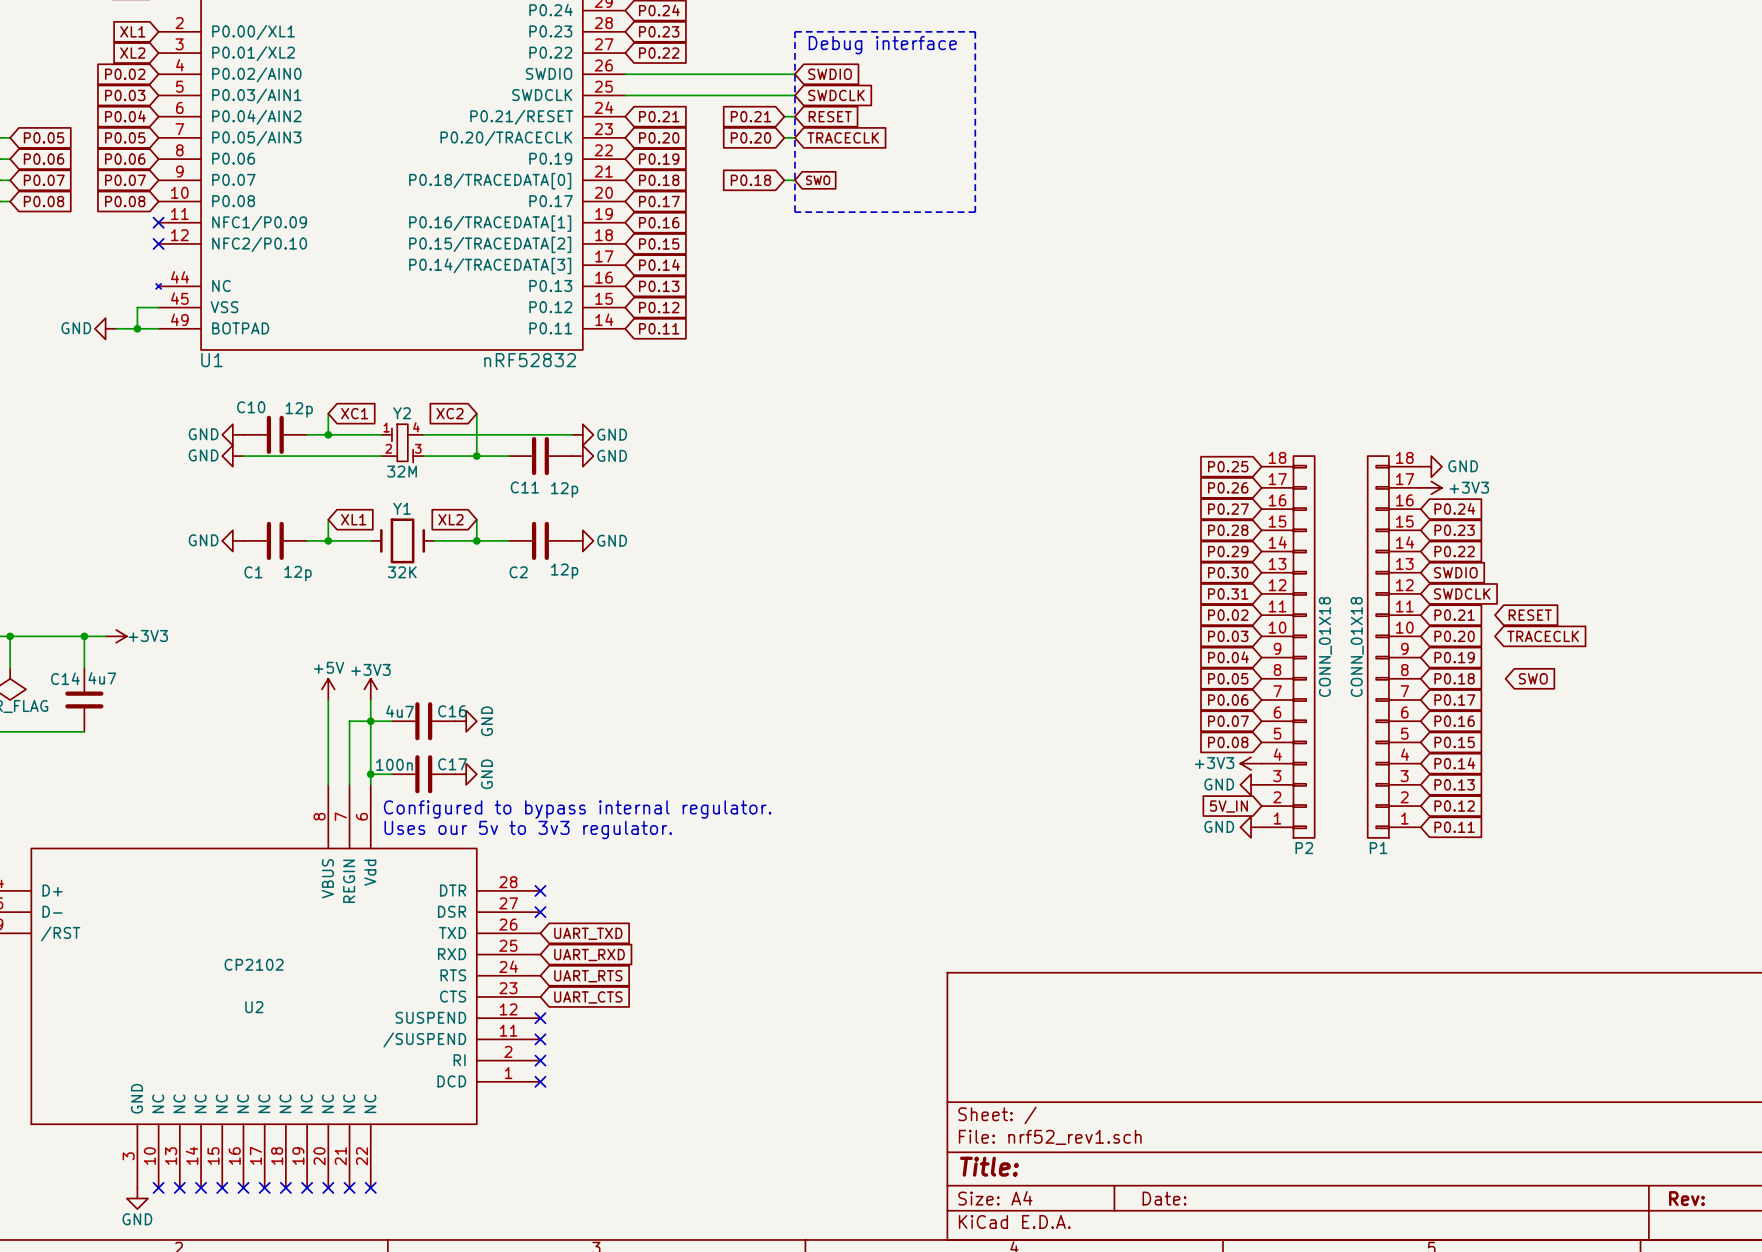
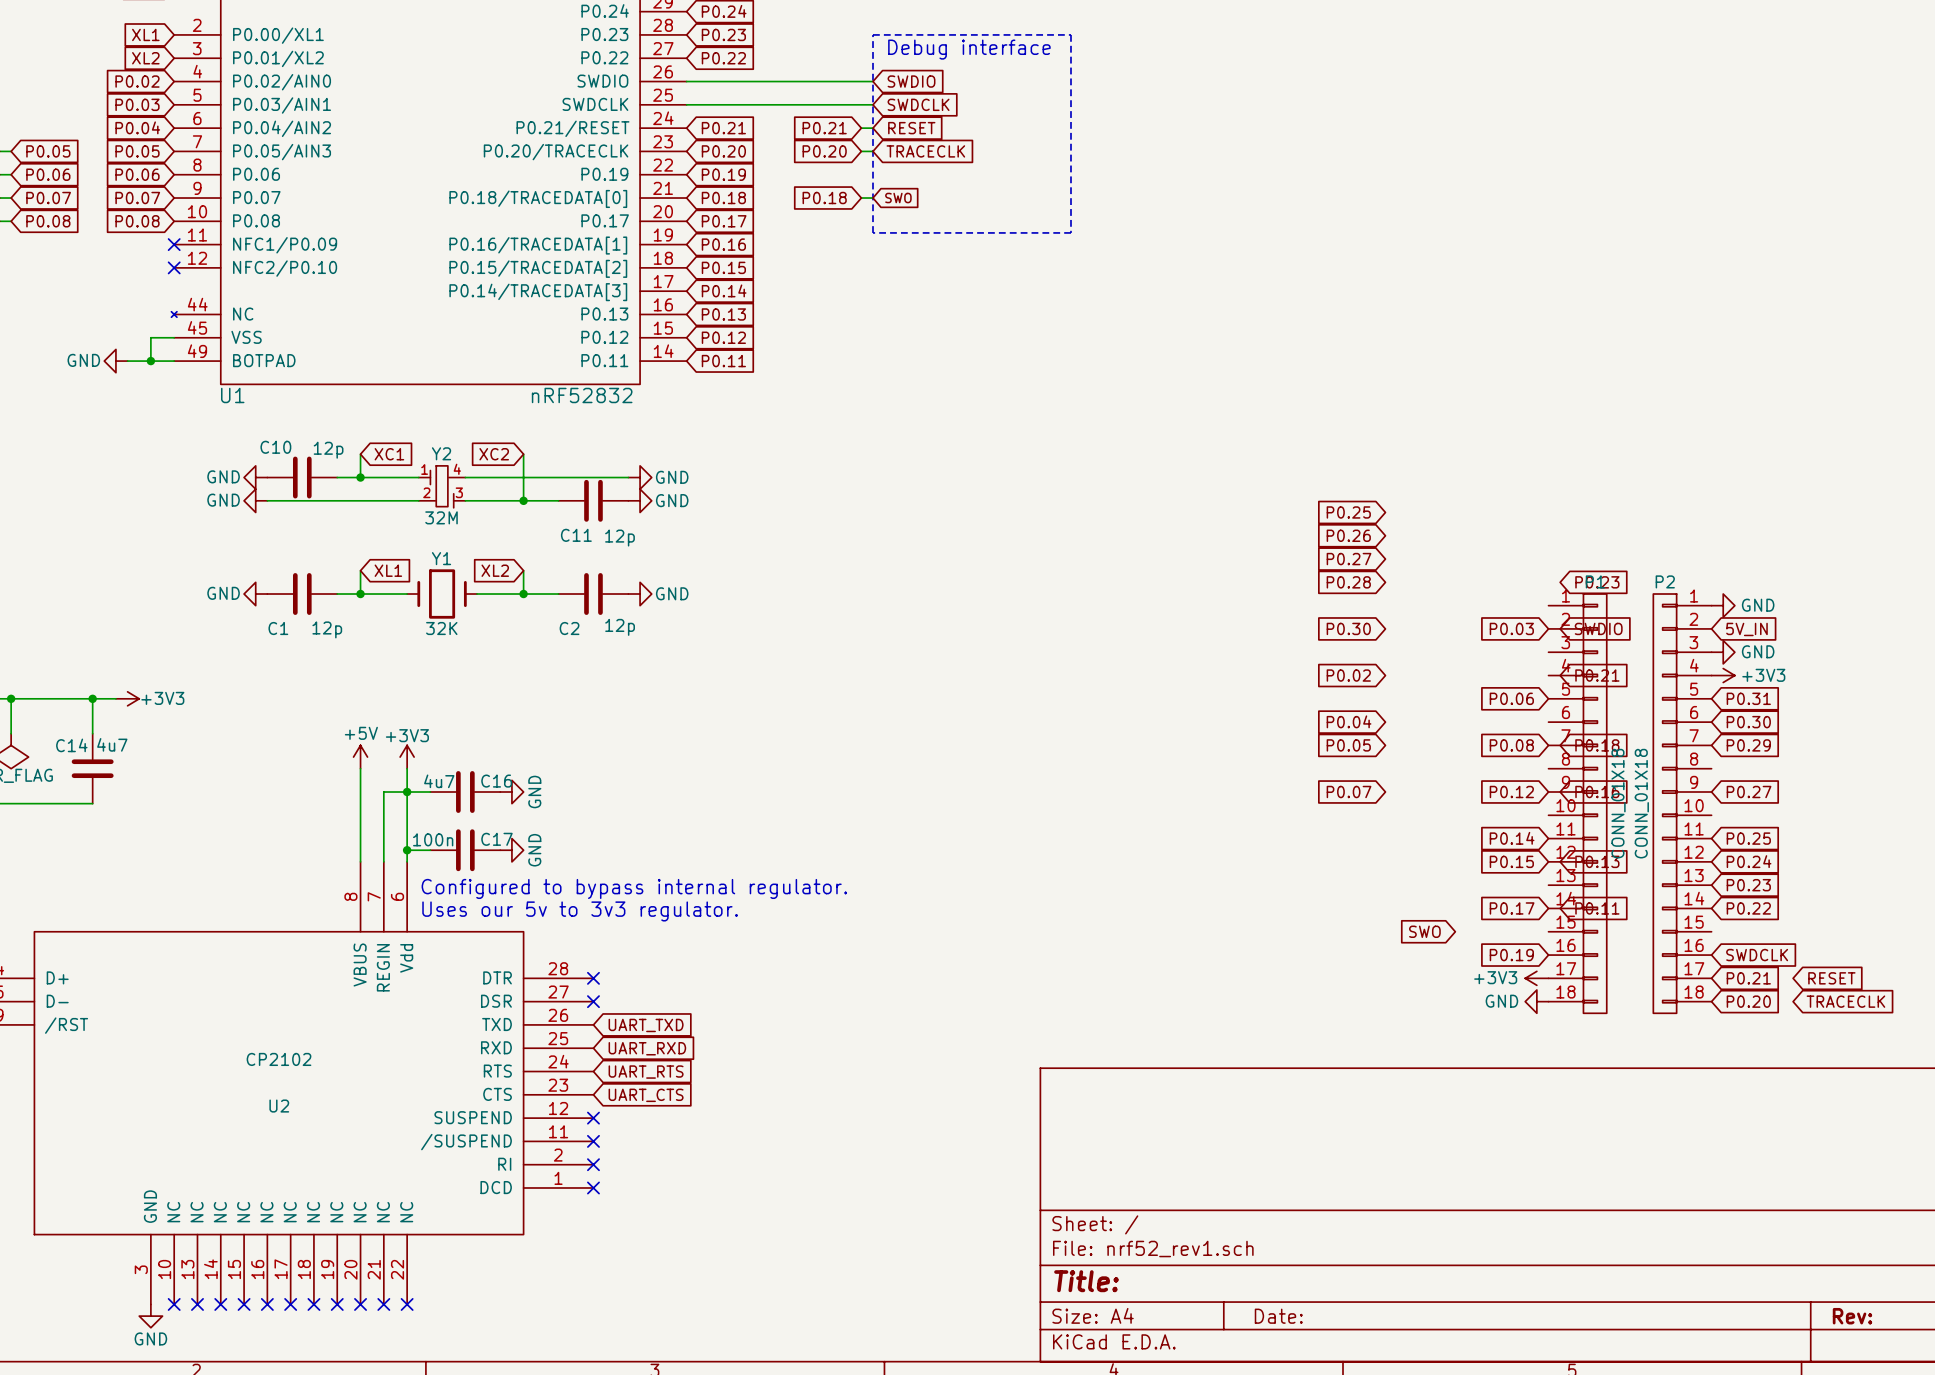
power symbol: GND (1431, 466) -> none
power symbol: +3V3 (1431, 487) -> none
global label: P0.24 (1454, 508) -> none
global label: P0.29 (1228, 551) -> none
global label: P0.22 (1454, 551) -> none
power symbol: none -> GND (1723, 605)
global label: none -> 5V_IN (1746, 629)
global label: P0.31 (1228, 593) -> none
global label: SWDCLK (1462, 593) -> none
power symbol: none -> GND (1723, 652)
global label: RESET (1530, 615) -> none
power symbol: none -> +3V3 (1723, 675)
global label position: P0.03 (1228, 636) -> P0.03 (1511, 628)
global label: P0.20 (1454, 636) -> none
global label: TRACECLK (1543, 636) -> none
global label: none -> P0.31 (1748, 698)
P2 position: (1288, 646) -> (1682, 803)
P2 rotation: 0° (1304, 646) -> 180° (1664, 803)
P1 rotation: 0° (1378, 646) -> 180° (1595, 803)
global label: P0.19 (1454, 657) -> none
global label: none -> P0.30 (1748, 722)
global label: SWO (1533, 678) -> none
global label: none -> P0.29 (1748, 745)
global label position: P0.06 (1228, 700) -> P0.06 (1511, 698)
global label rotation: 0° (1454, 700) -> 180° (1512, 908)
global label position: P0.17 (1454, 700) -> P0.17 (1512, 908)
global label: none -> P0.27 (1749, 792)
global label position: P0.08 (1228, 742) -> P0.08 (1511, 745)
global label rotation: 0° (1454, 742) -> 180° (1511, 861)
global label position: P0.15 (1454, 742) -> P0.15 (1511, 861)
power symbol: +3V3 (1251, 763) -> none
global label rotation: 0° (1454, 763) -> 180° (1512, 838)
global label position: P0.14 (1454, 763) -> P0.14 (1512, 838)
global label: none -> P0.25 (1748, 838)
power symbol: GND (1251, 784) -> none
global label: none -> P0.24 (1749, 861)
global label: 5V_IN (1228, 806) -> none
global label rotation: 0° (1454, 806) -> 180° (1511, 792)
global label position: P0.12 (1454, 806) -> P0.12 (1511, 792)
global label: none -> P0.23 (1748, 885)
power symbol: GND (1251, 827) -> none
global label: none -> P0.22 (1748, 908)
global label: none -> SWO (1424, 931)
global label: none -> P0.19 (1511, 955)
global label: none -> SWDCLK (1757, 955)
power symbol: none -> +3V3 (1536, 978)
global label: none -> P0.21 (1748, 978)
global label: none -> RESET (1831, 978)
power symbol: none -> GND (1536, 1001)
global label: none -> P0.20 (1748, 1001)
global label: none -> TRACECLK (1845, 1001)

